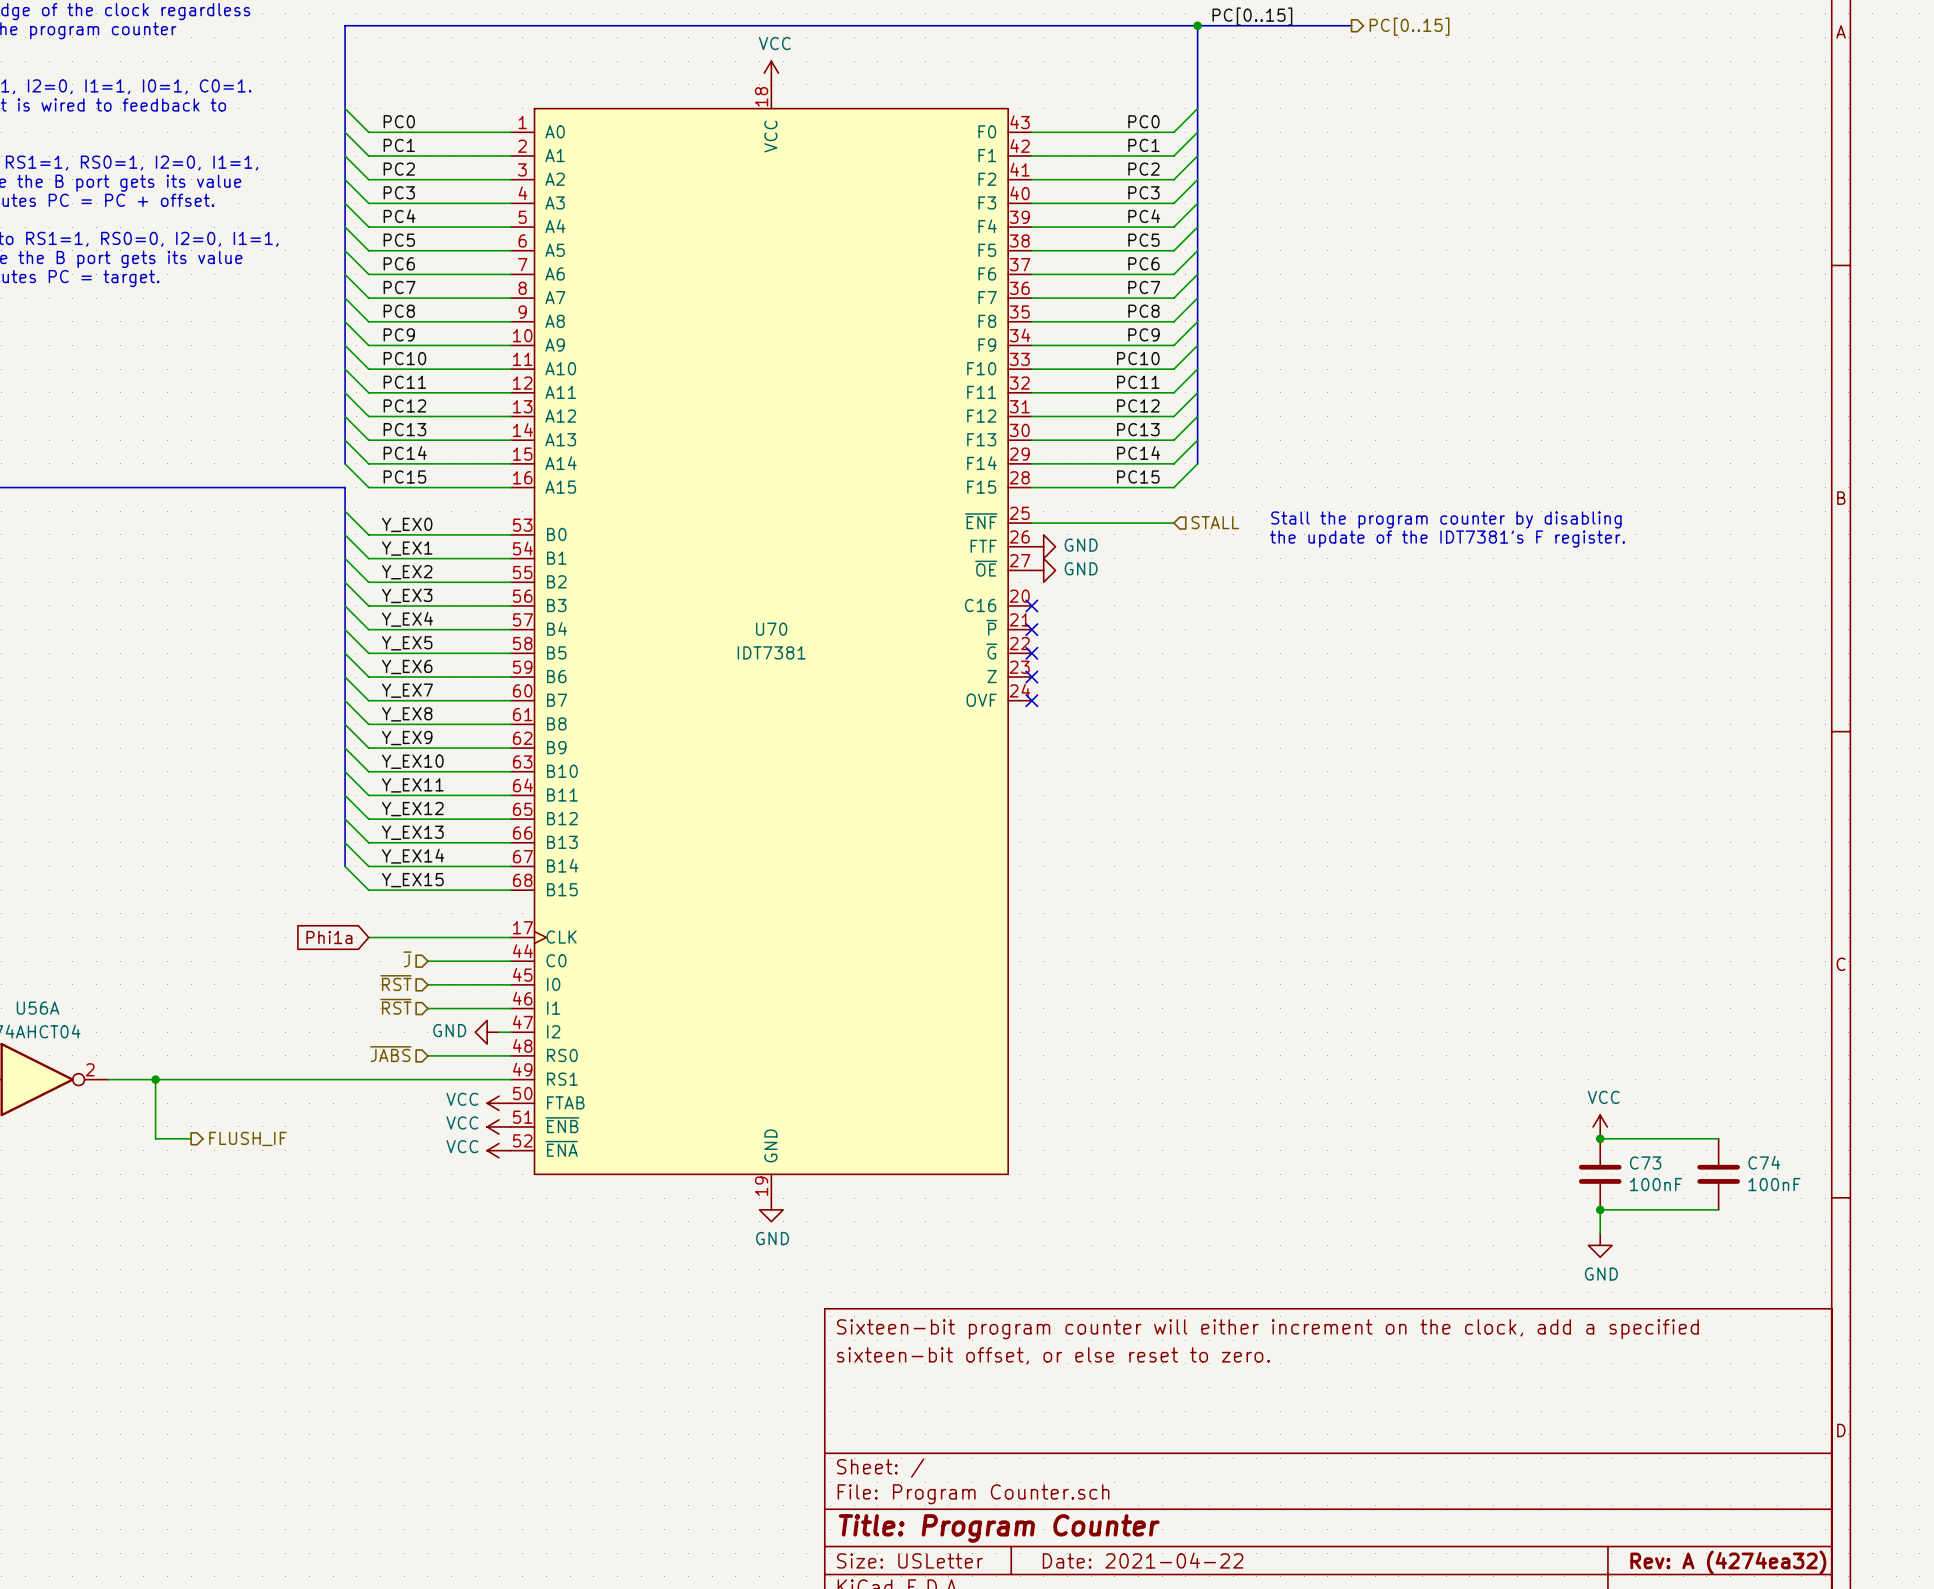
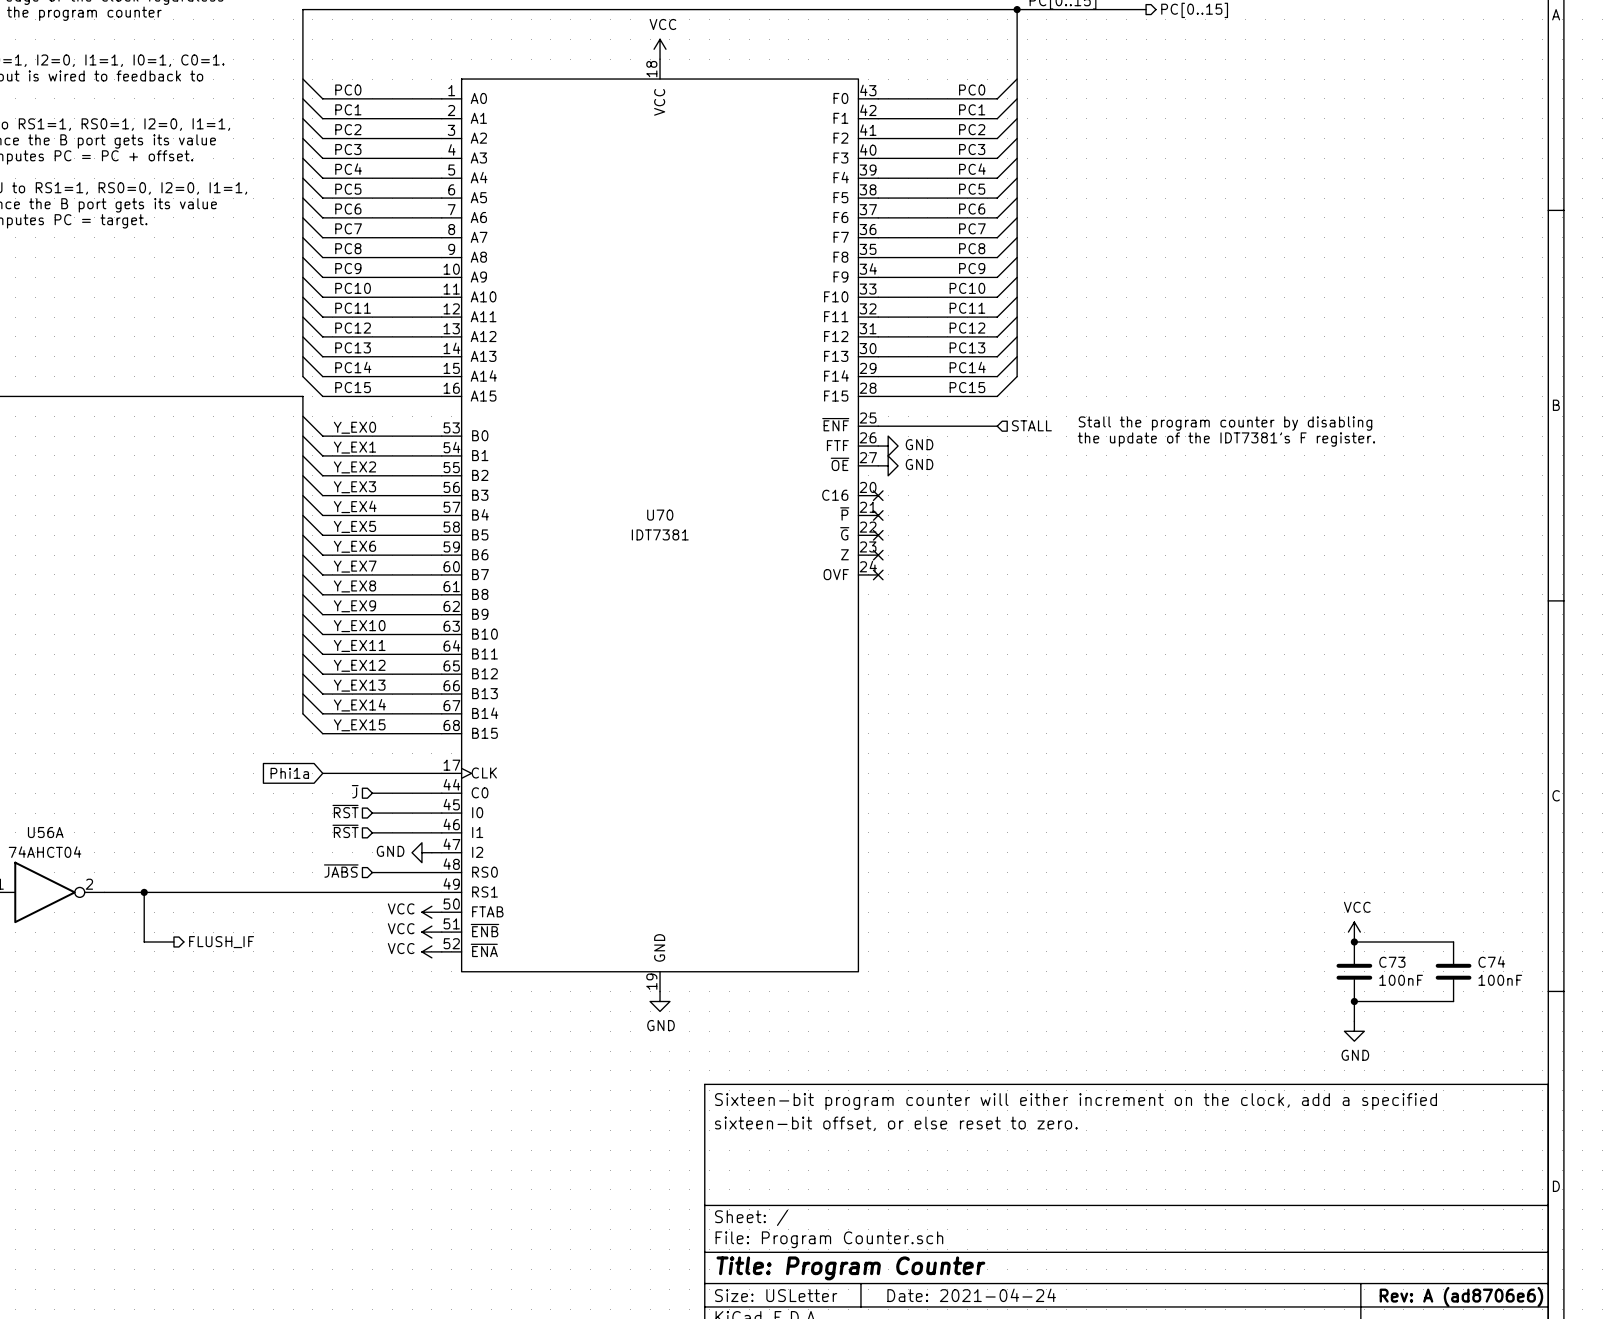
title block: Date: 2021-04-22 (1143, 1560) -> Date: 2021-04-24 (971, 1295)
title block: Rev: A (4274ea32) (1728, 1562) -> Rev: A (ad8706e6) (1461, 1297)

